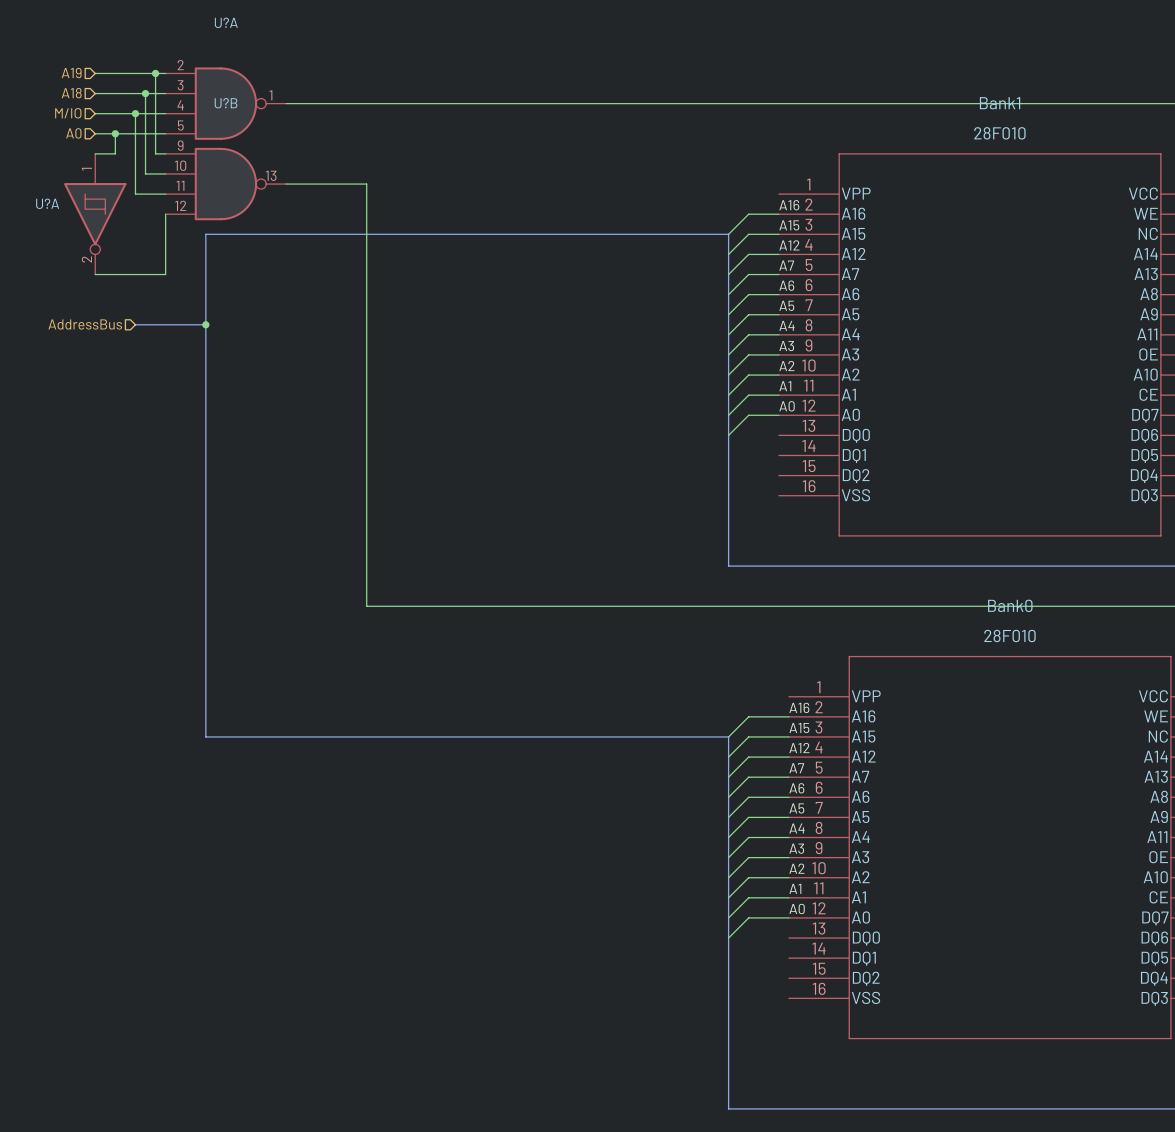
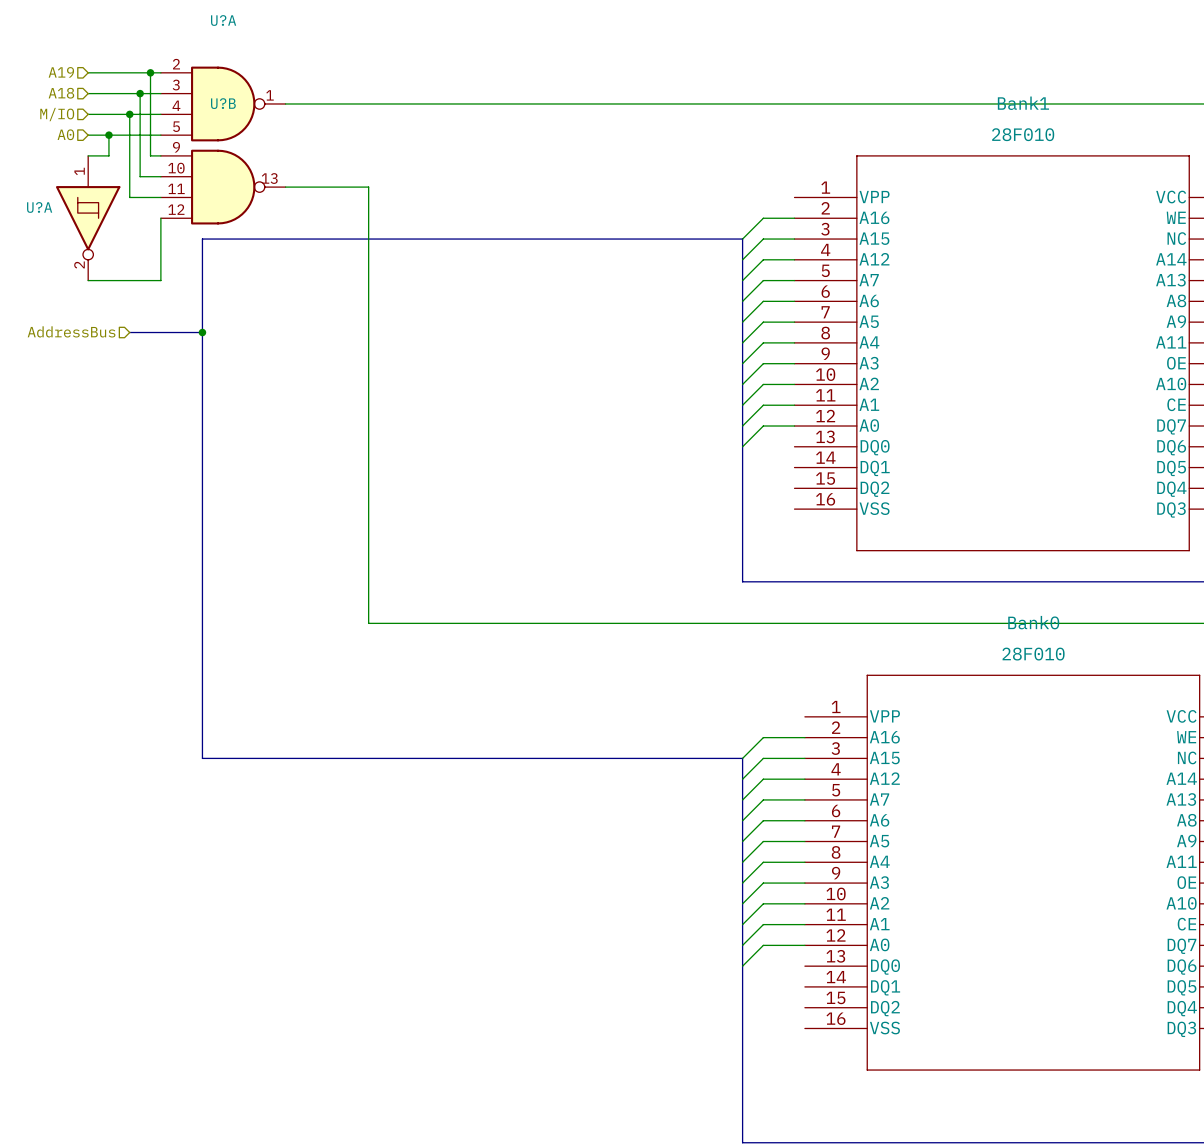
label: A16 (789, 205) -> none
label: A15 (789, 225) -> none
label: A12 (789, 245) -> none
label: A7 (786, 265) -> none
label: A6 (786, 285) -> none
label: A5 (786, 305) -> none
label: A4 (786, 325) -> none
label: A3 (786, 346) -> none
label: A2 (786, 366) -> none
label: A1 (785, 386) -> none
label: A0 (787, 406) -> none
label: A16 (799, 707) -> none
label: A15 (799, 728) -> none
label: A12 (799, 748) -> none
label: A7 (796, 768) -> none
label: A6 (796, 788) -> none
label: A5 (796, 808) -> none
label: A4 (797, 828) -> none
label: A3 (796, 848) -> none
label: A2 (796, 868) -> none
label: A1 (795, 888) -> none
label: A0 (797, 908) -> none

